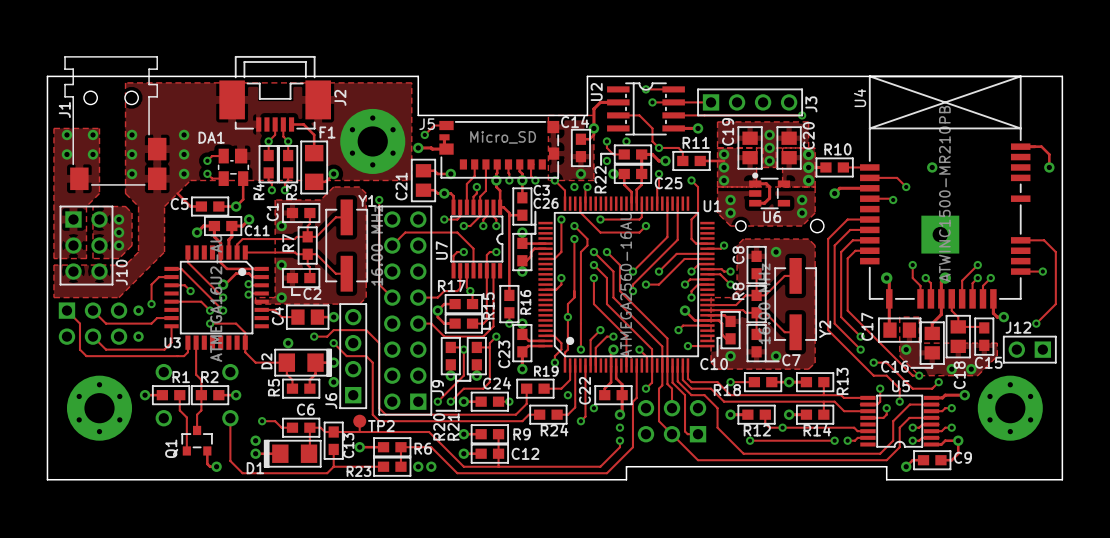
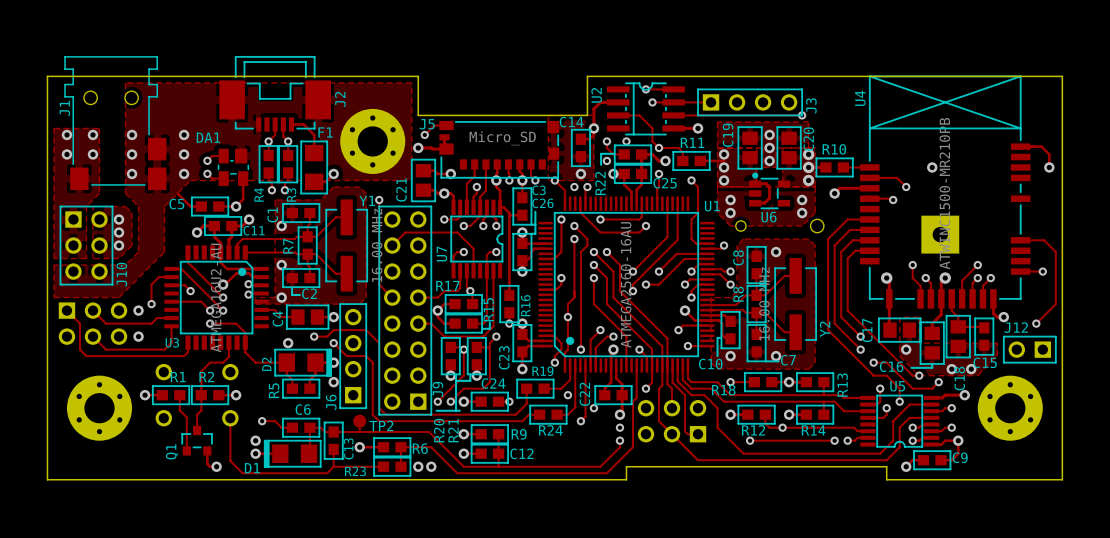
track: (196, 342) (196, 374) (201, 379) -> (228, 342) (228, 356) (223, 362) (210, 362) (201, 371) (201, 379)

